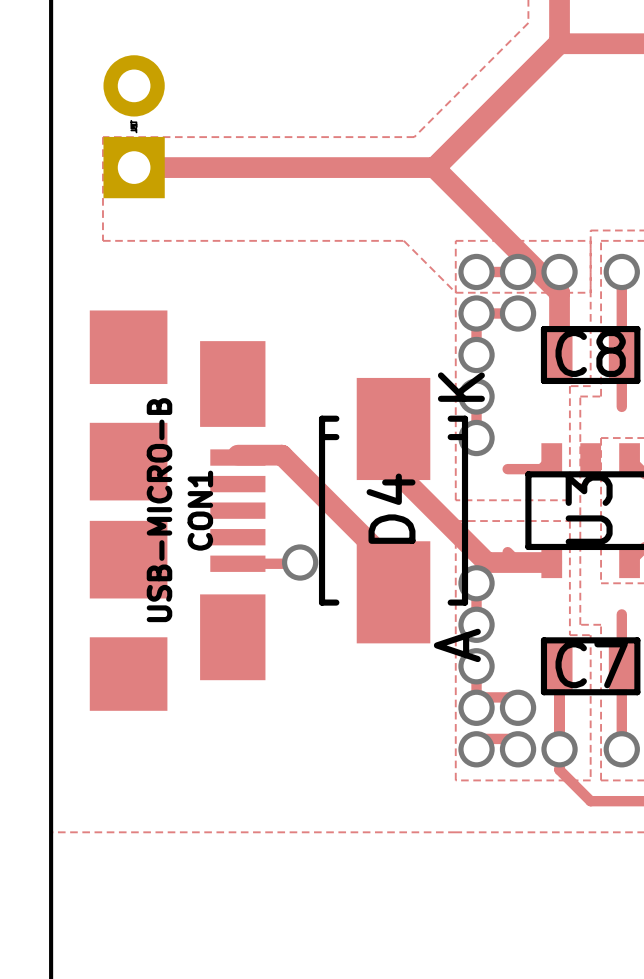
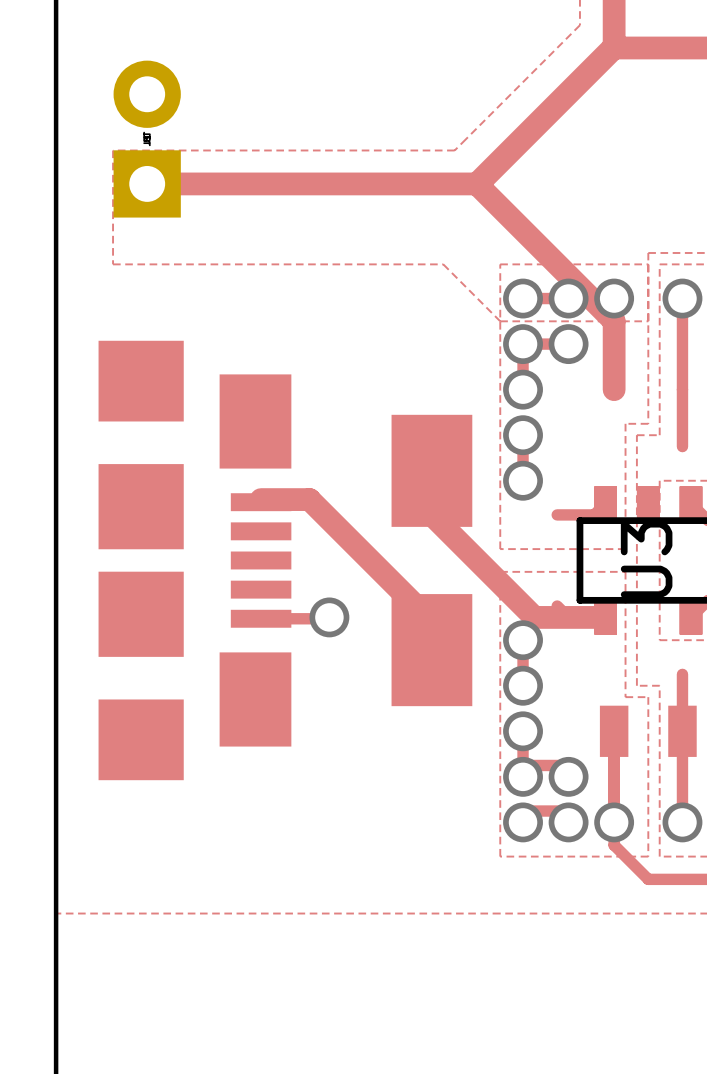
C8: (590, 355) -> none
CON1 value: USB-MICRO-B (159, 510) -> none
CON1 name: CON1 (200, 510) -> none
D4: (393, 510) -> none
part: none -> (431, 560)
part: none -> (648, 560)
C7: (590, 666) -> none
part: none -> (648, 731)

